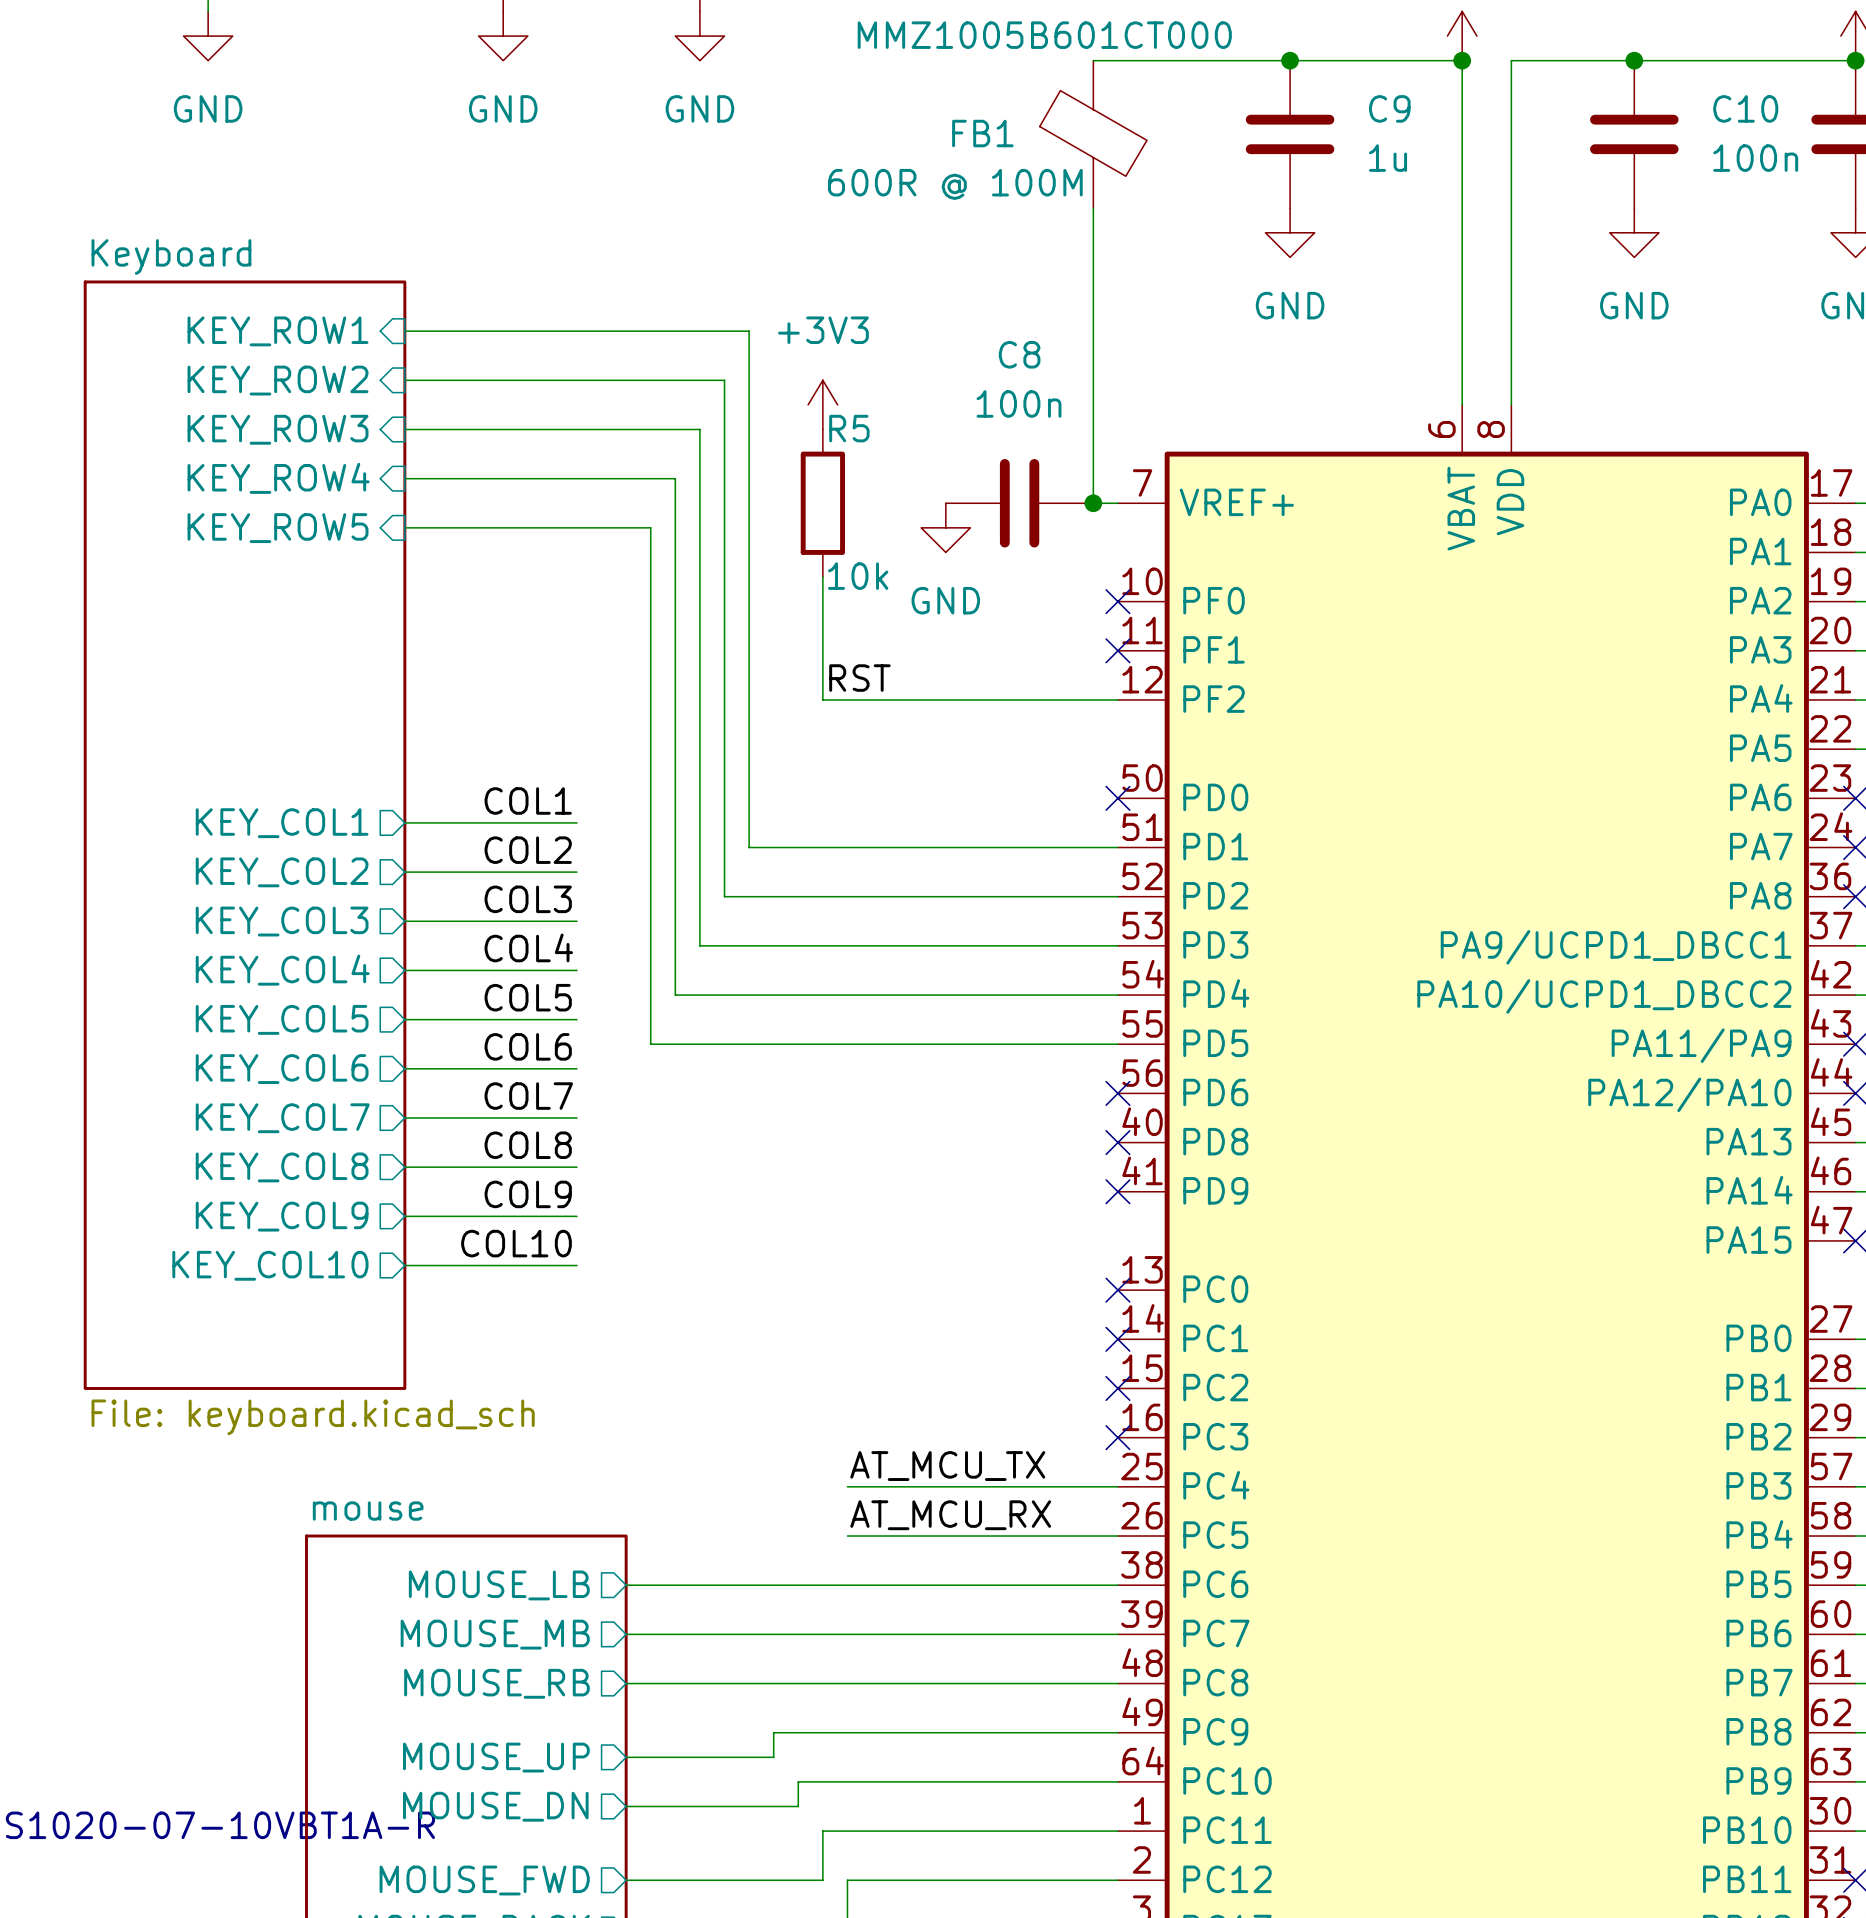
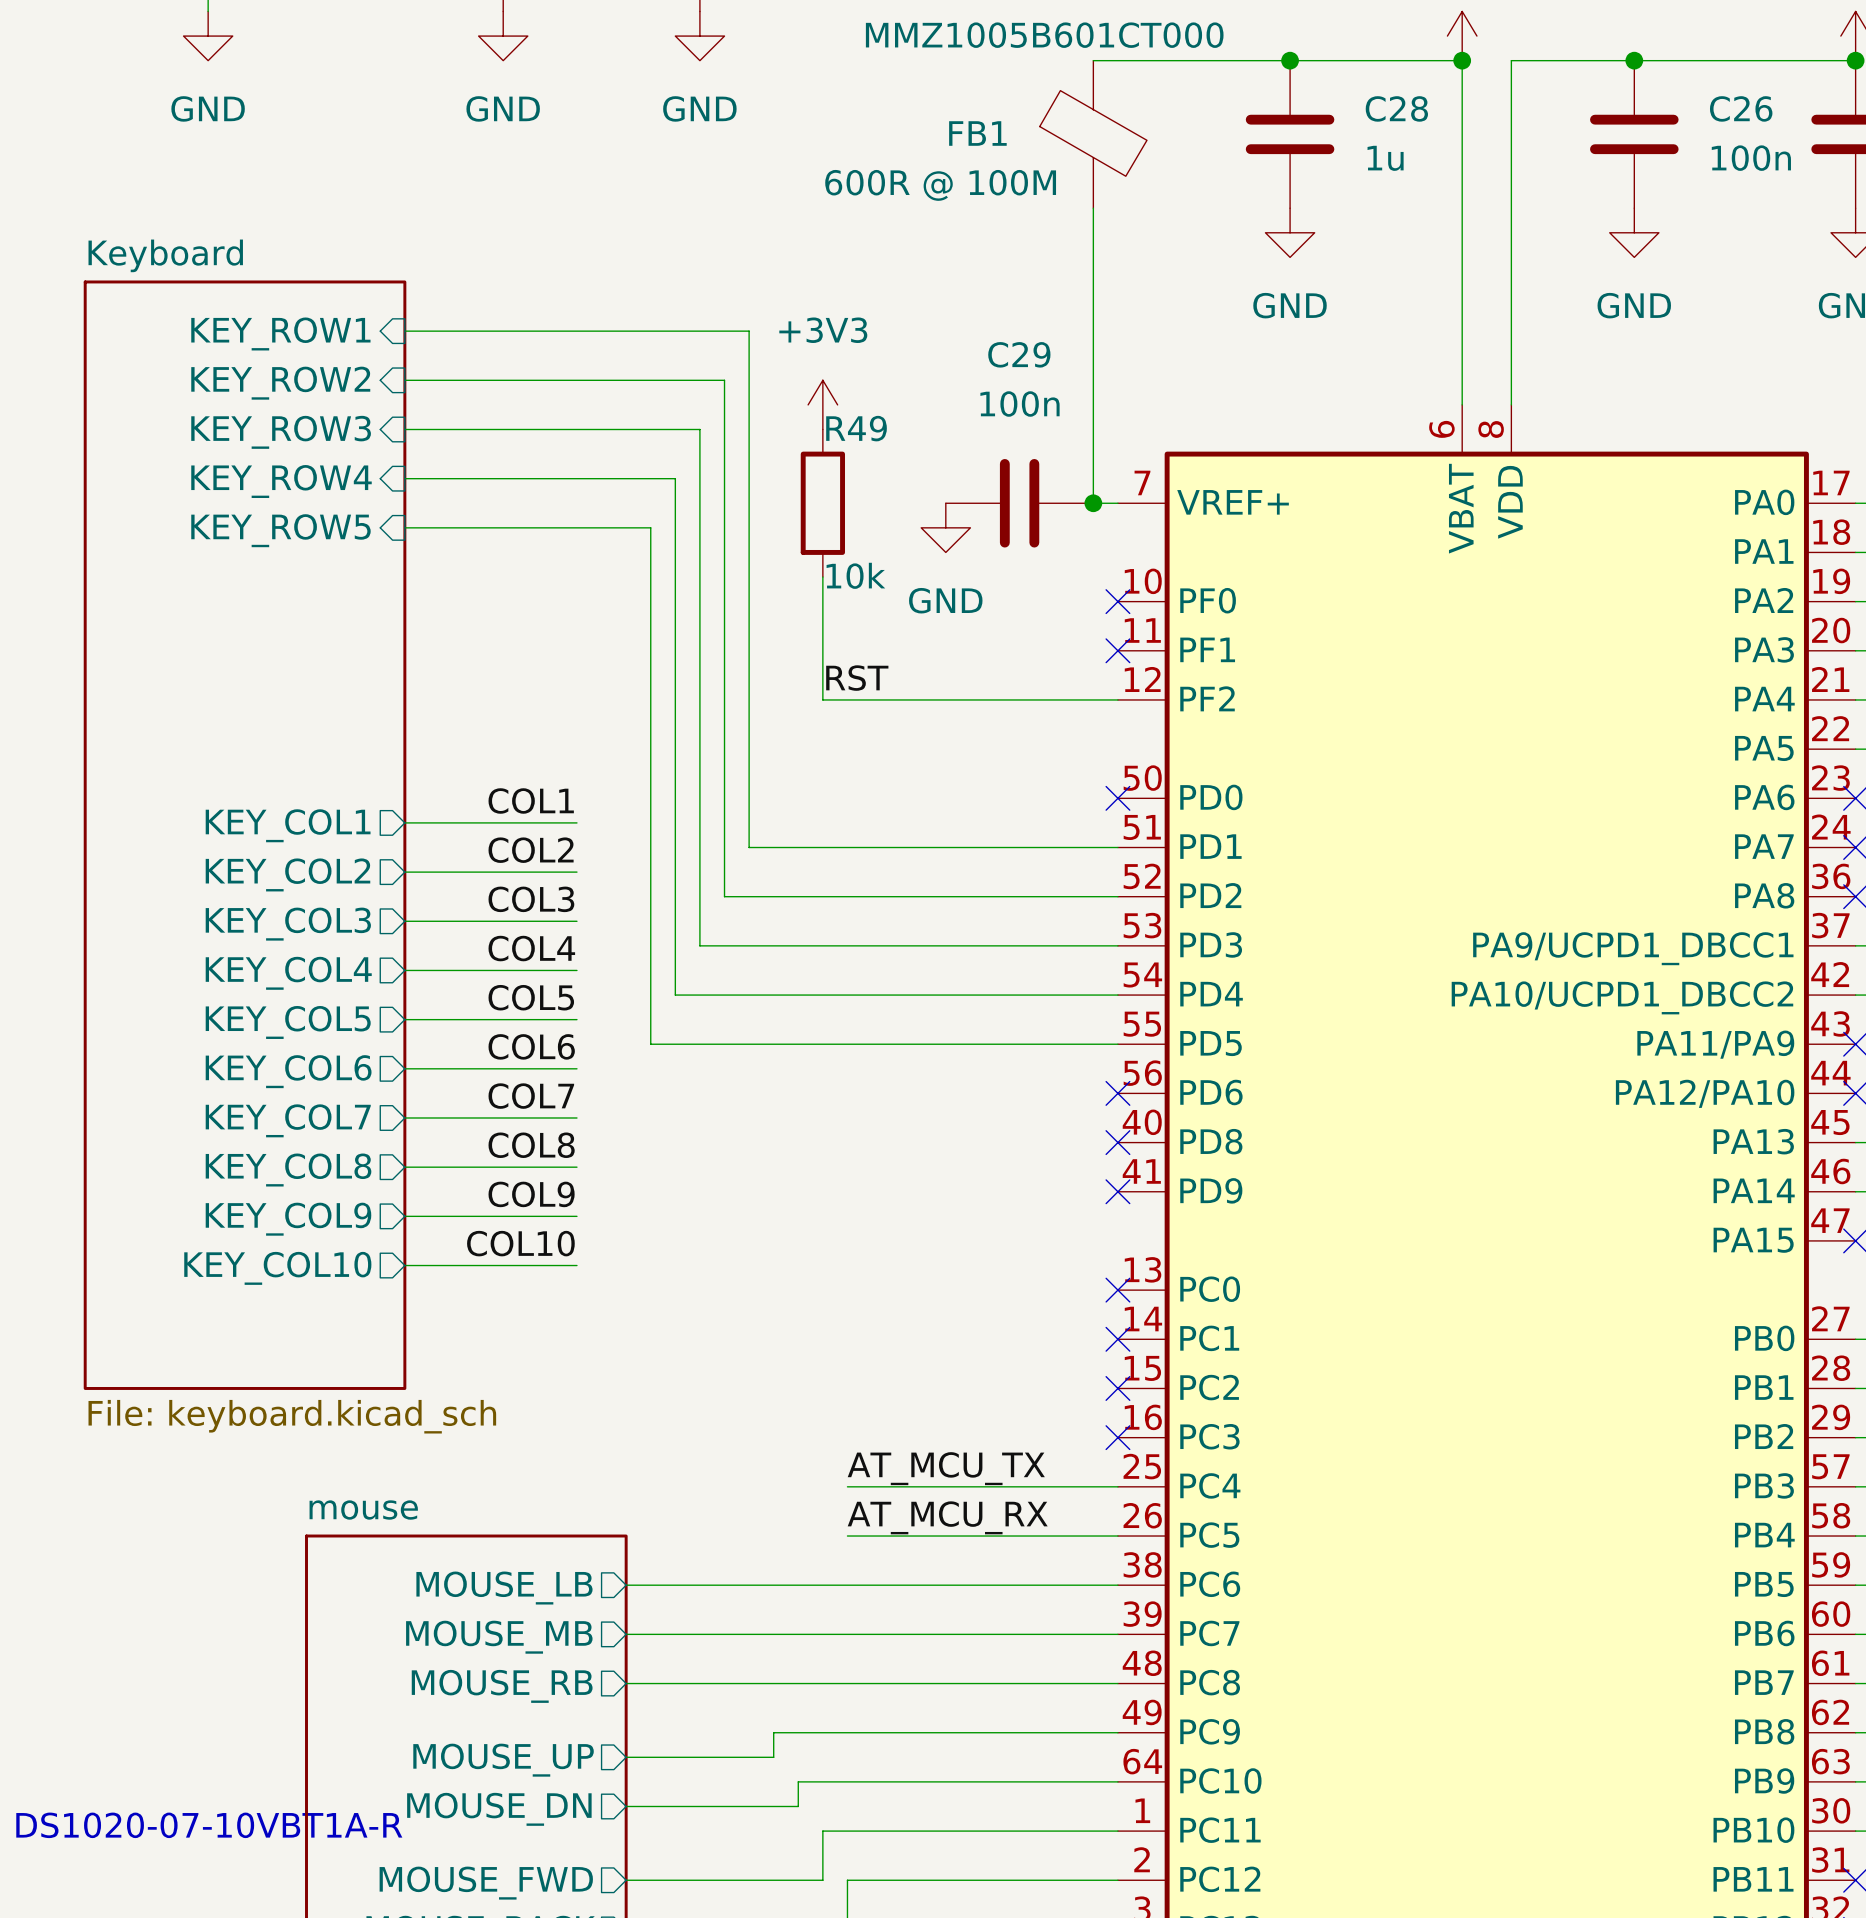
C9 name: C9 (1389, 108) -> C28 (1396, 108)
C10 name: C10 (1745, 108) -> C26 (1741, 108)
C8 name: C8 (1019, 354) -> C29 (1019, 354)
R5 name: R5 (849, 428) -> R49 (856, 428)

